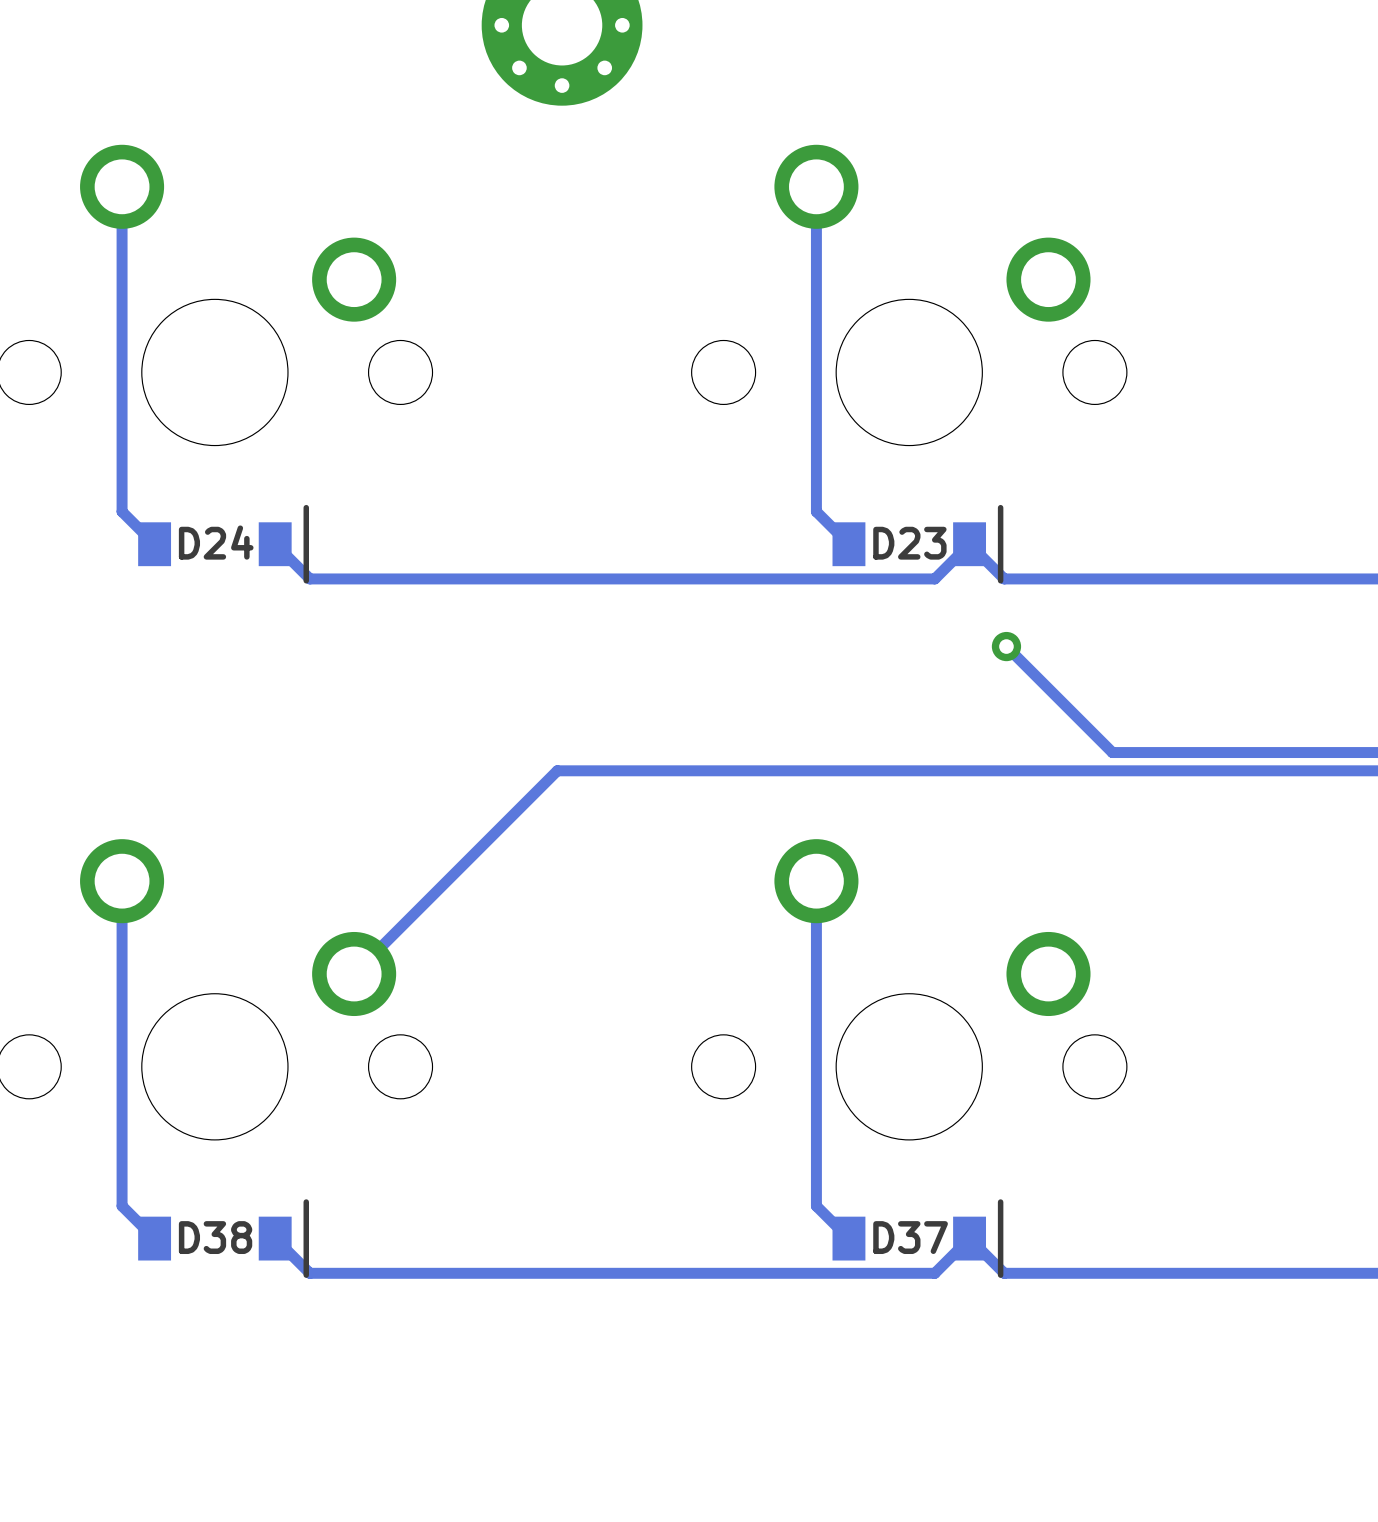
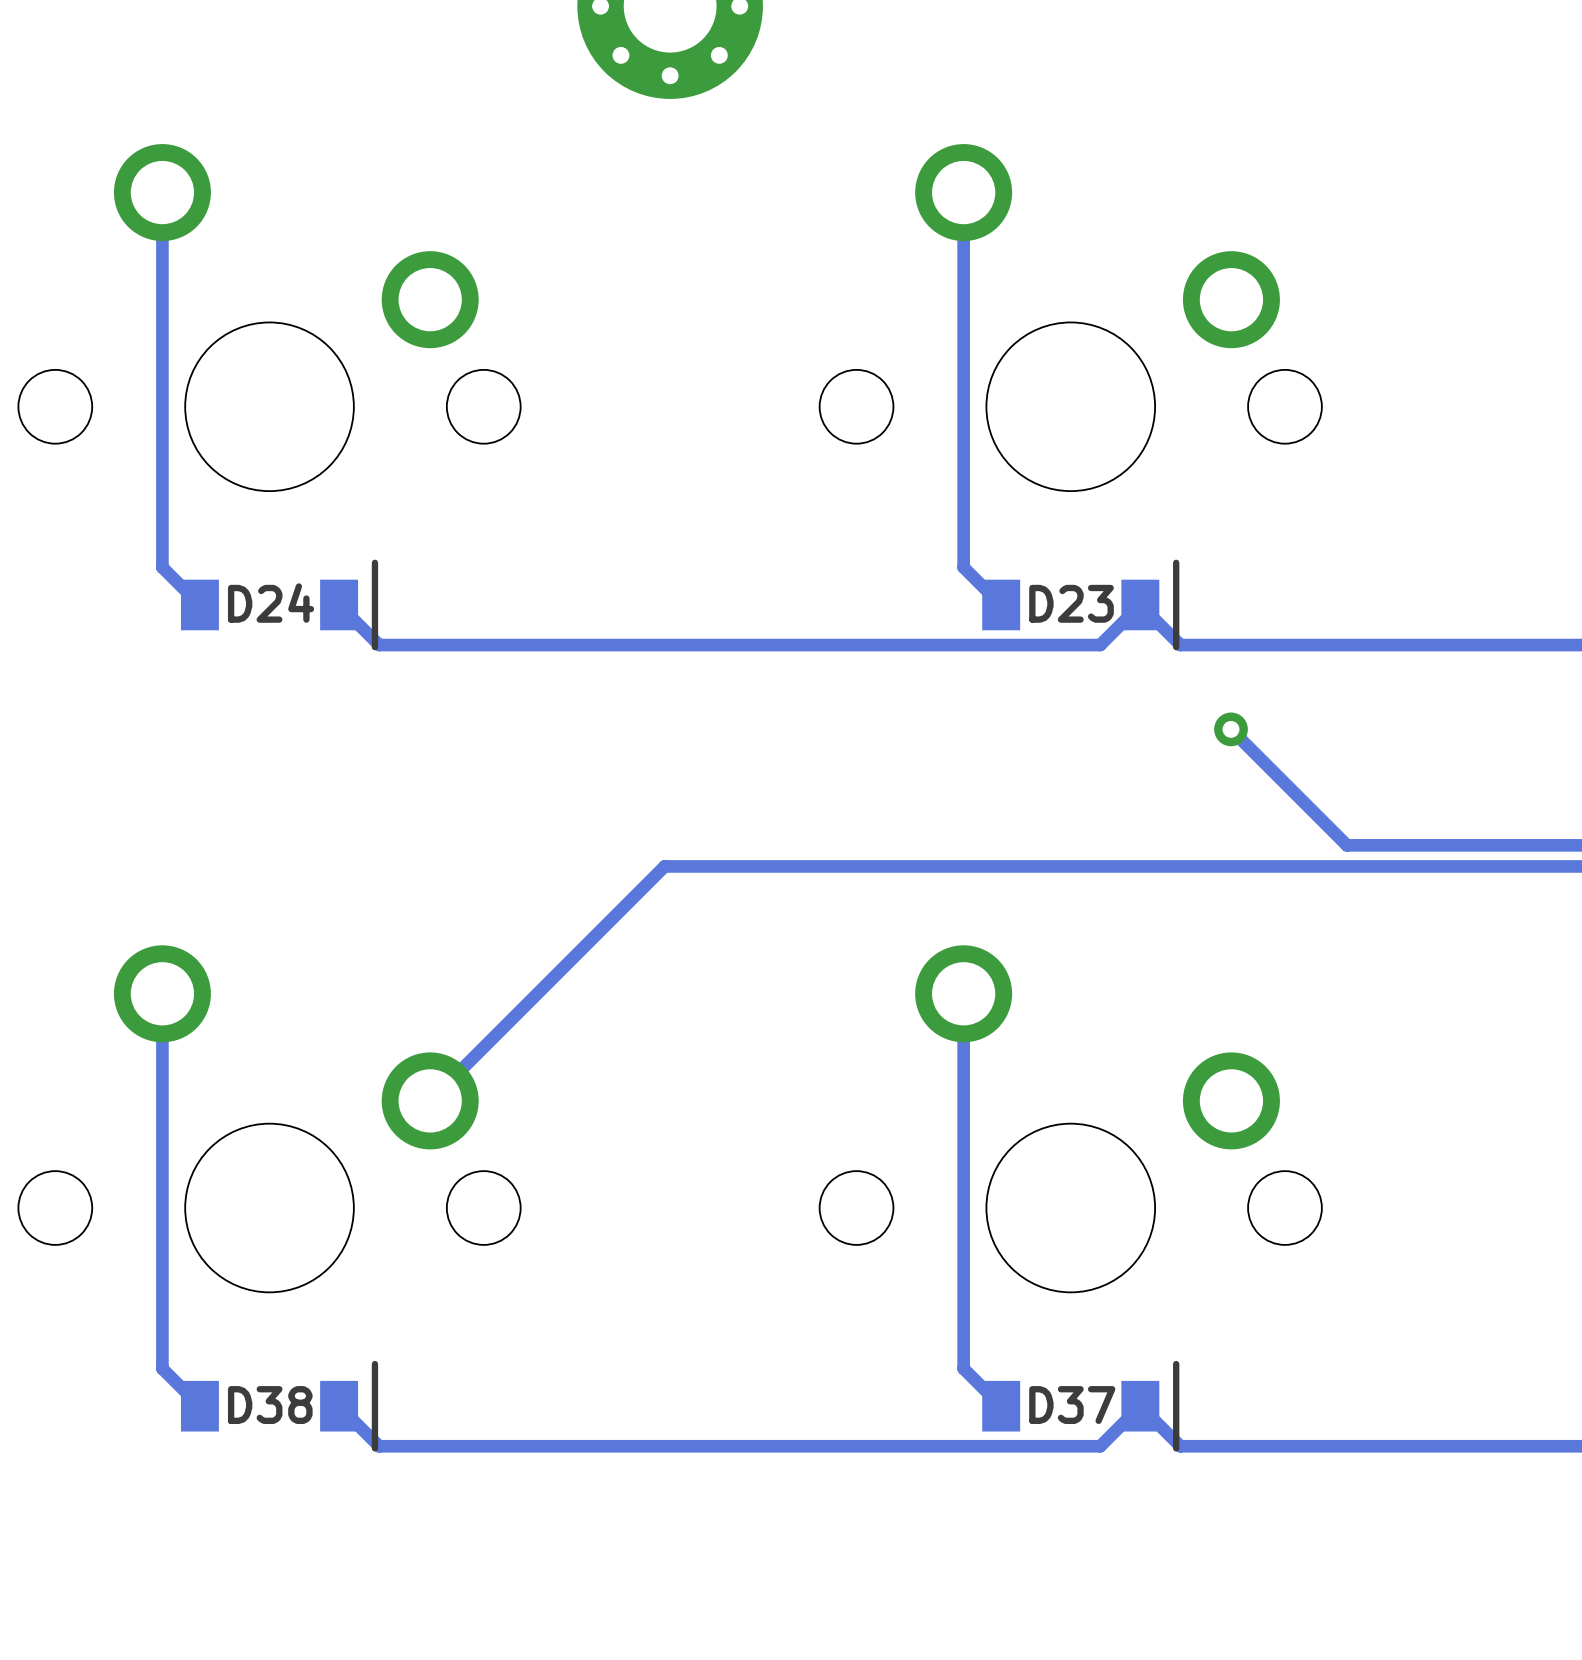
track: (1006, 646) (1112, 752) (1148, 752) -> (1231, 729) (1346, 845)
via position: (1006, 646) -> (1231, 729)

